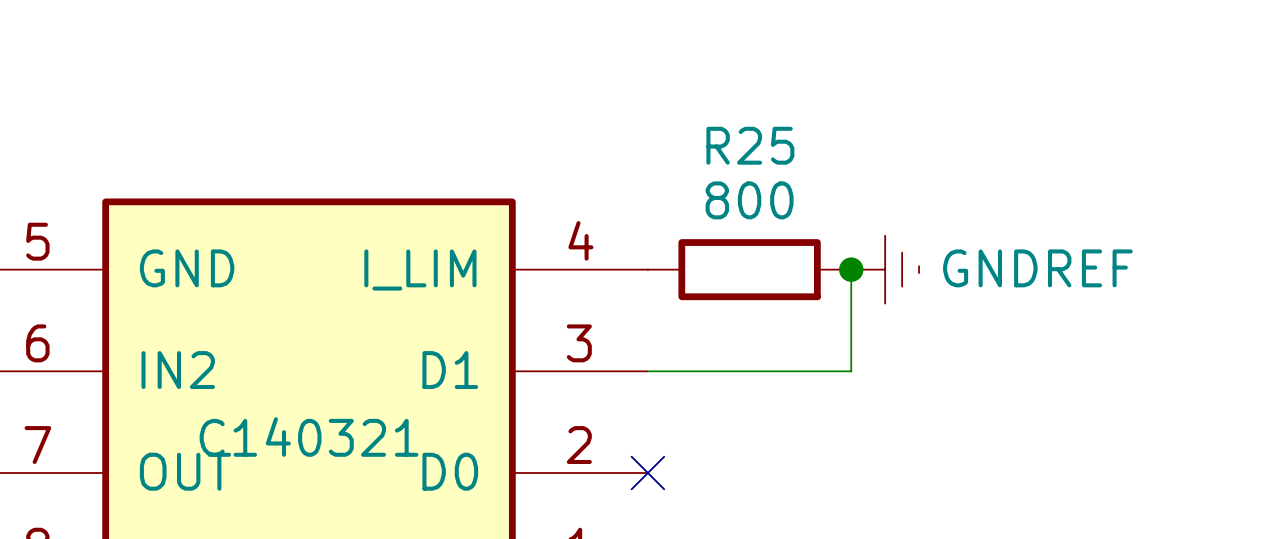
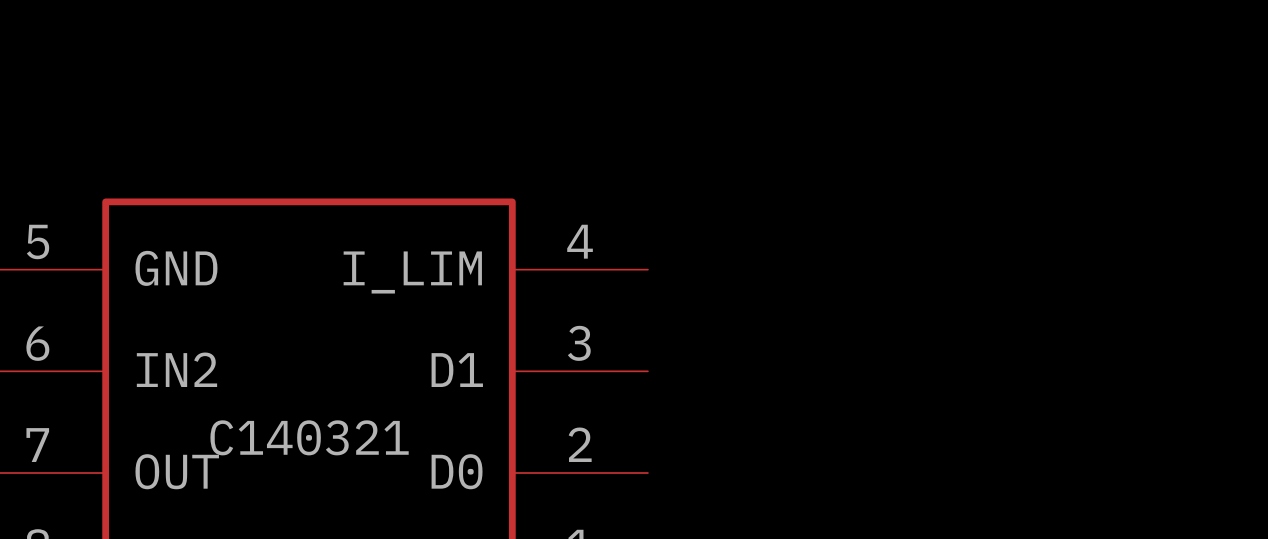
R25: 800 (749, 269) -> none
wire: (851, 269) (851, 371) (647, 371) -> none
junction: (851, 269) -> none
power symbol: GNDREF (885, 269) -> none
no-connect mark: (647, 472) -> none

